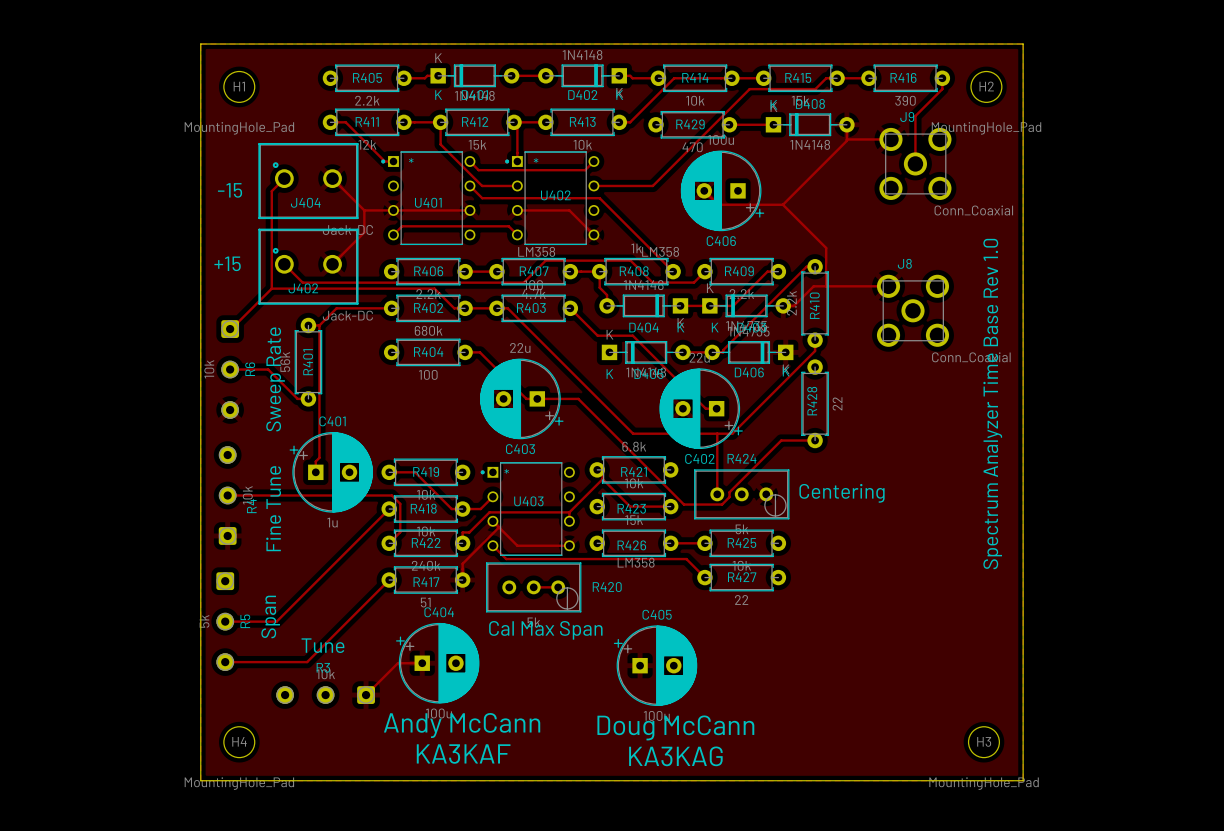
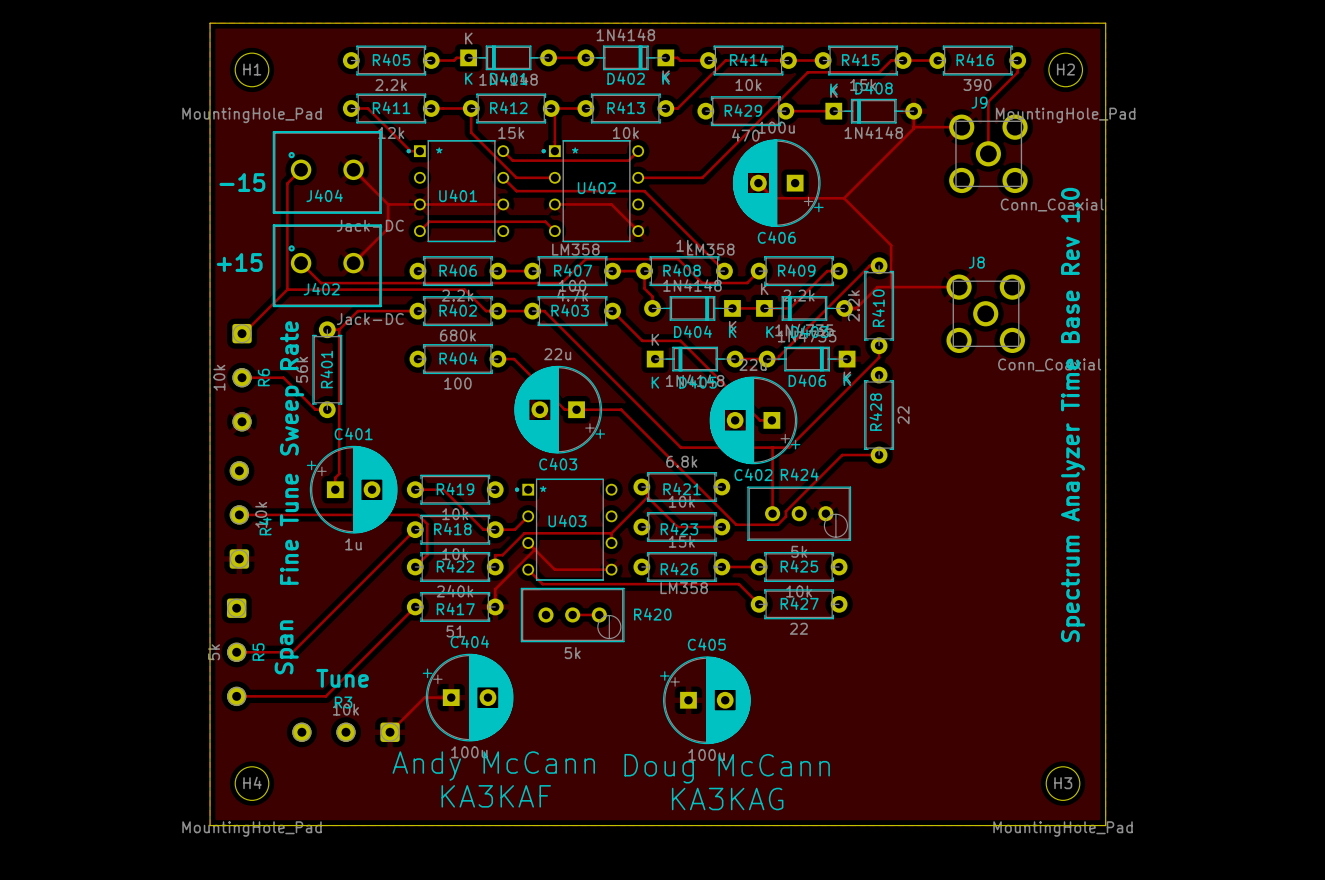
text: Centering (842, 493) -> none
text: Cal Max Span (545, 630) -> none

